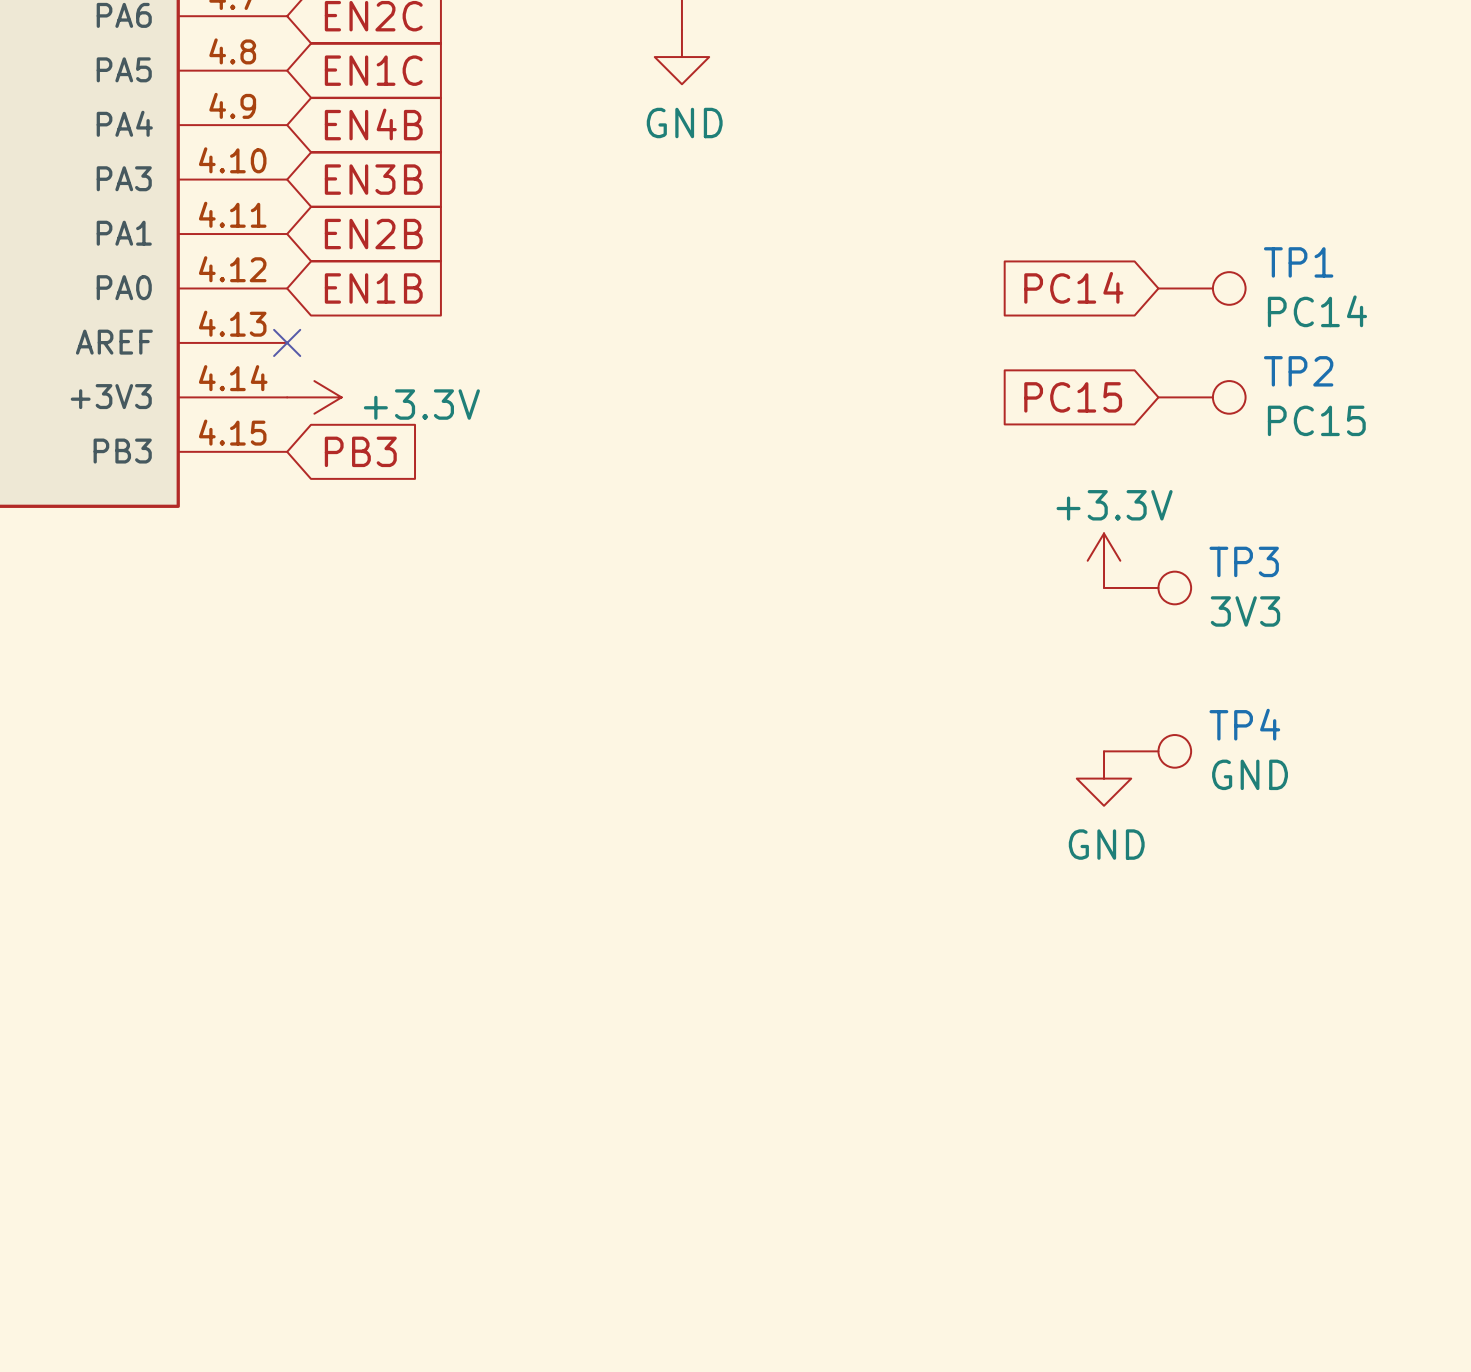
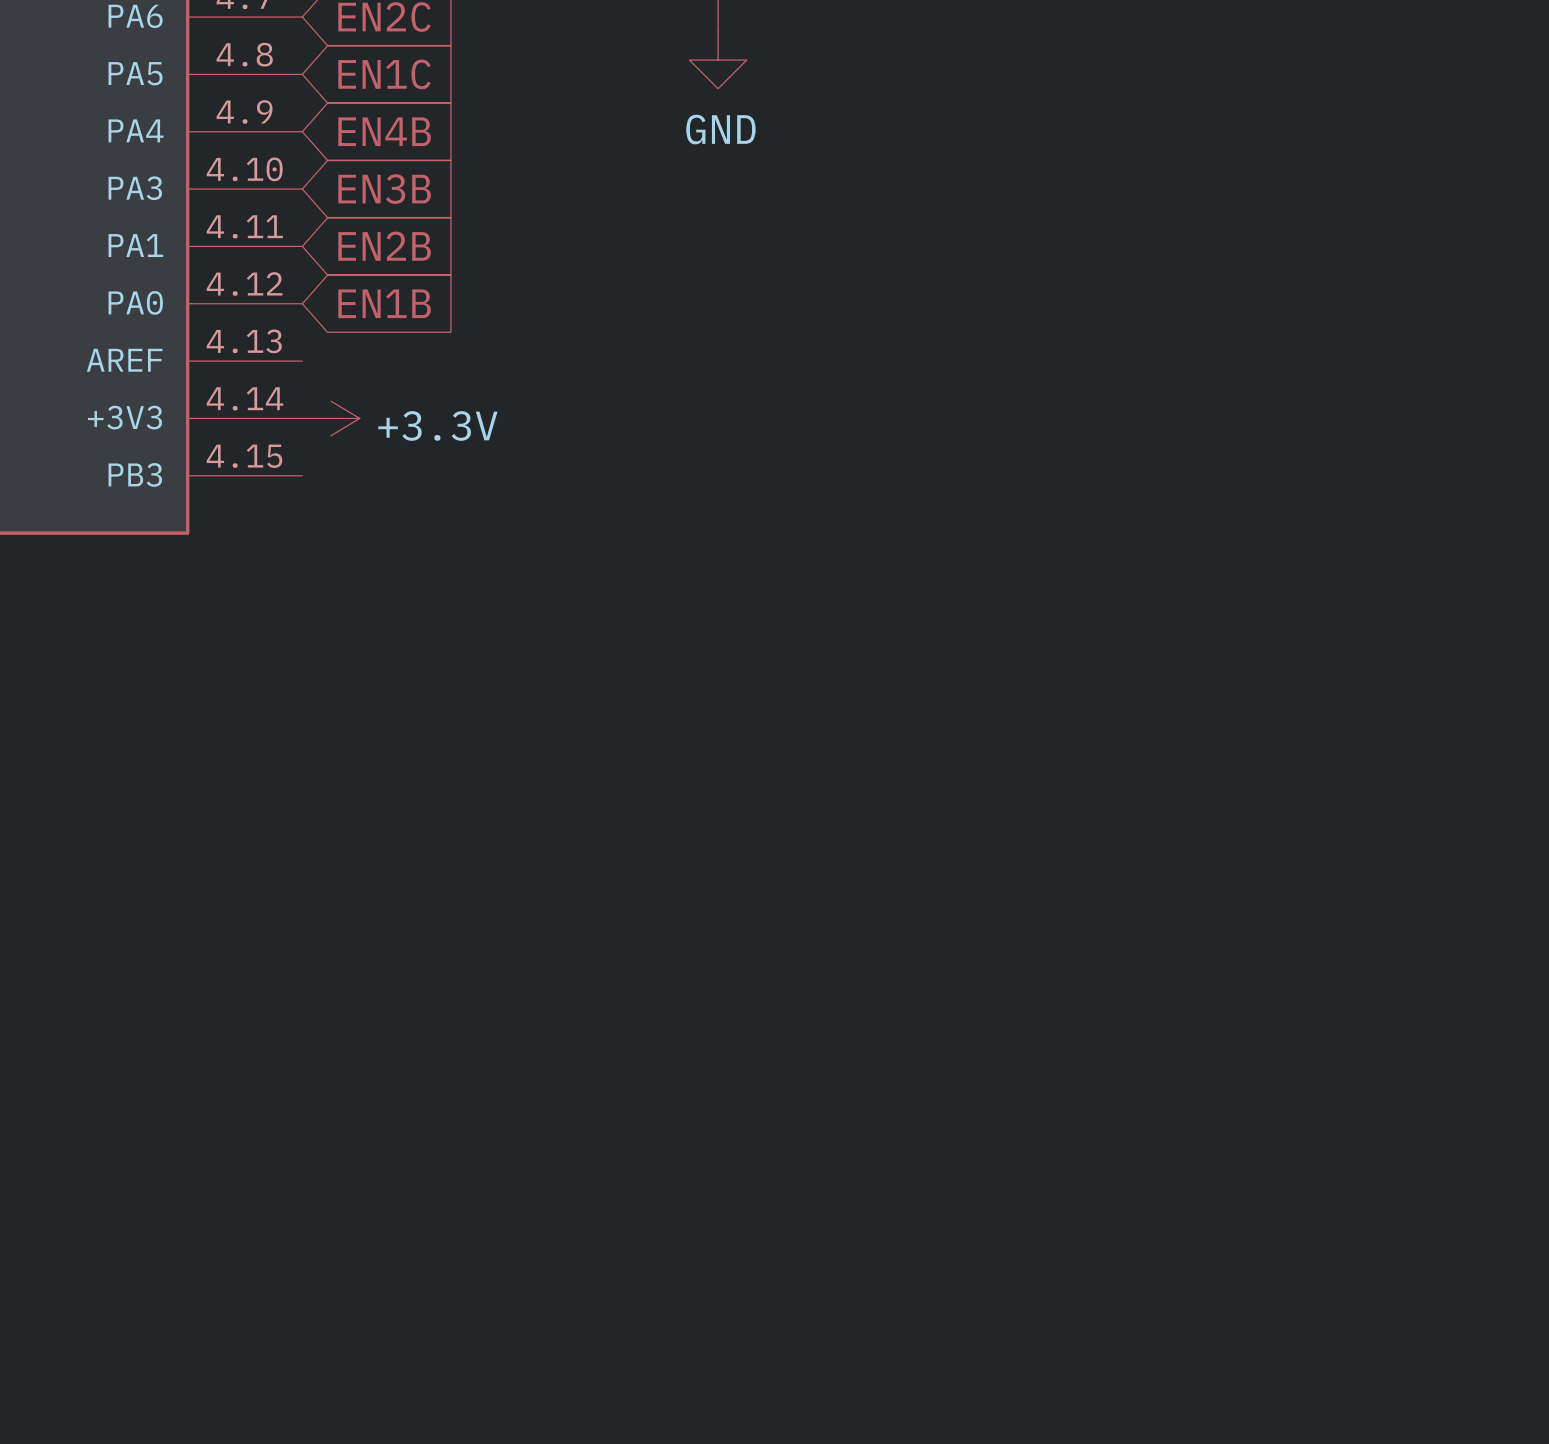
global label: PC14 (1073, 287) -> none
TP1: PC14 (1202, 288) -> none
no-connect mark: (287, 342) -> none
global label: PC15 (1073, 397) -> none
TP2: PC15 (1202, 397) -> none
global label: PB3 (360, 451) -> none
power symbol: +3.3V (1104, 560) -> none
TP3: 3V3 (1147, 587) -> none
TP4: GND (1147, 751) -> none
power symbol: GND (1104, 778) -> none

